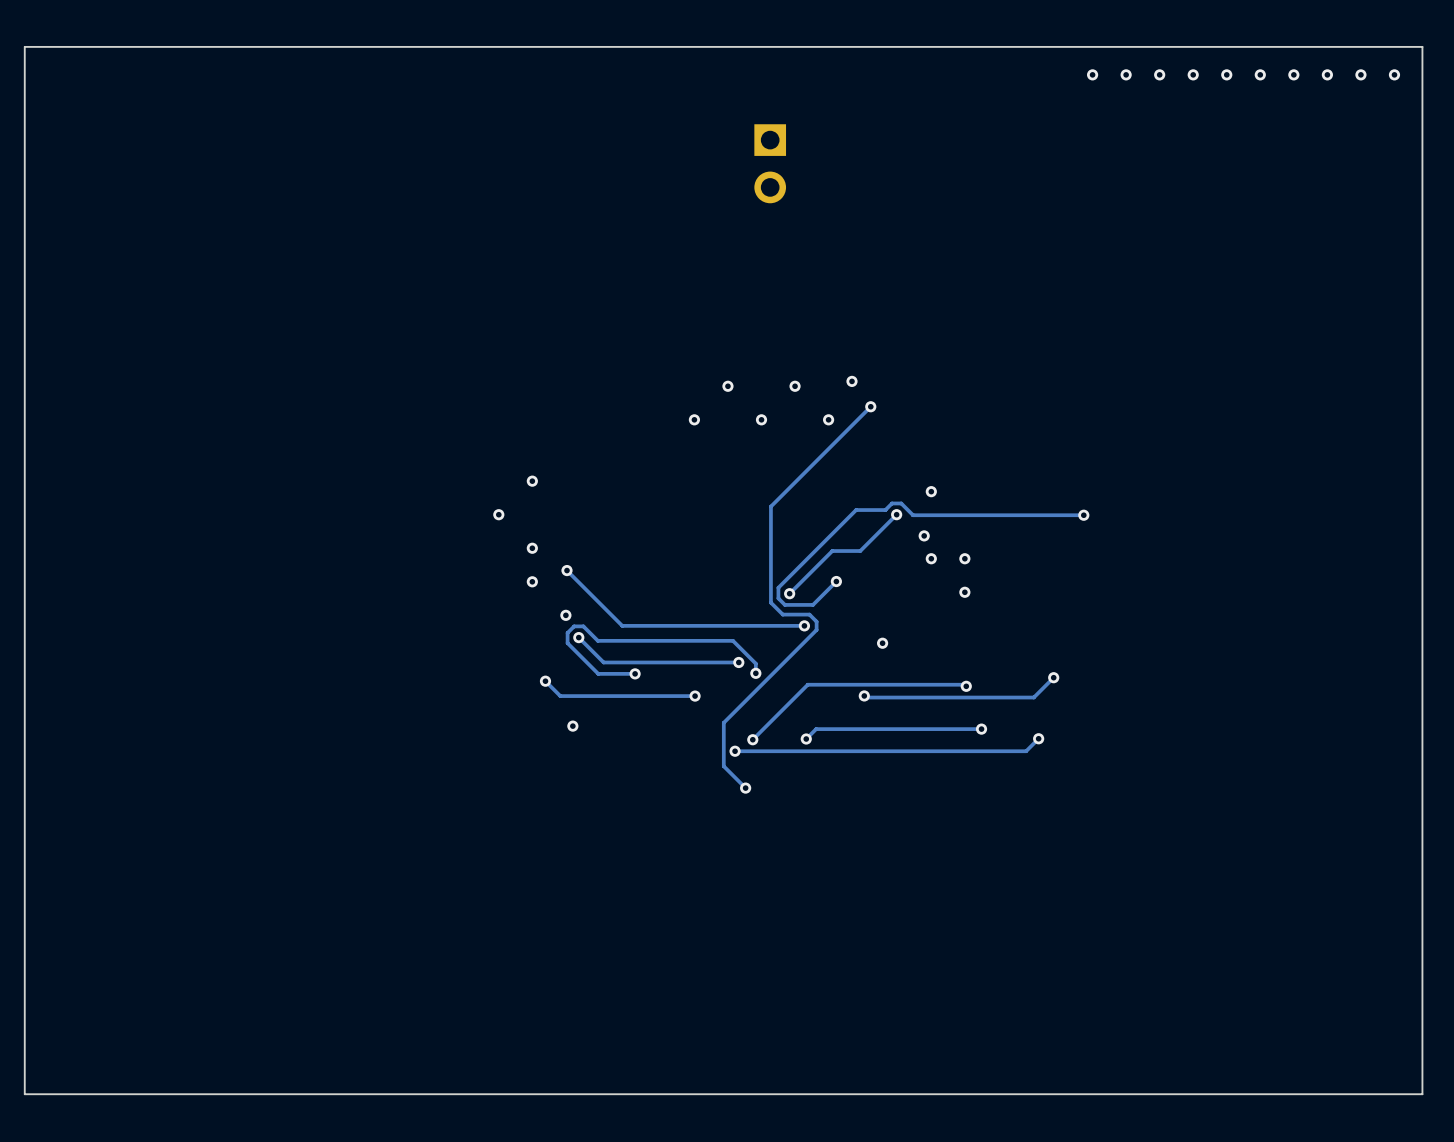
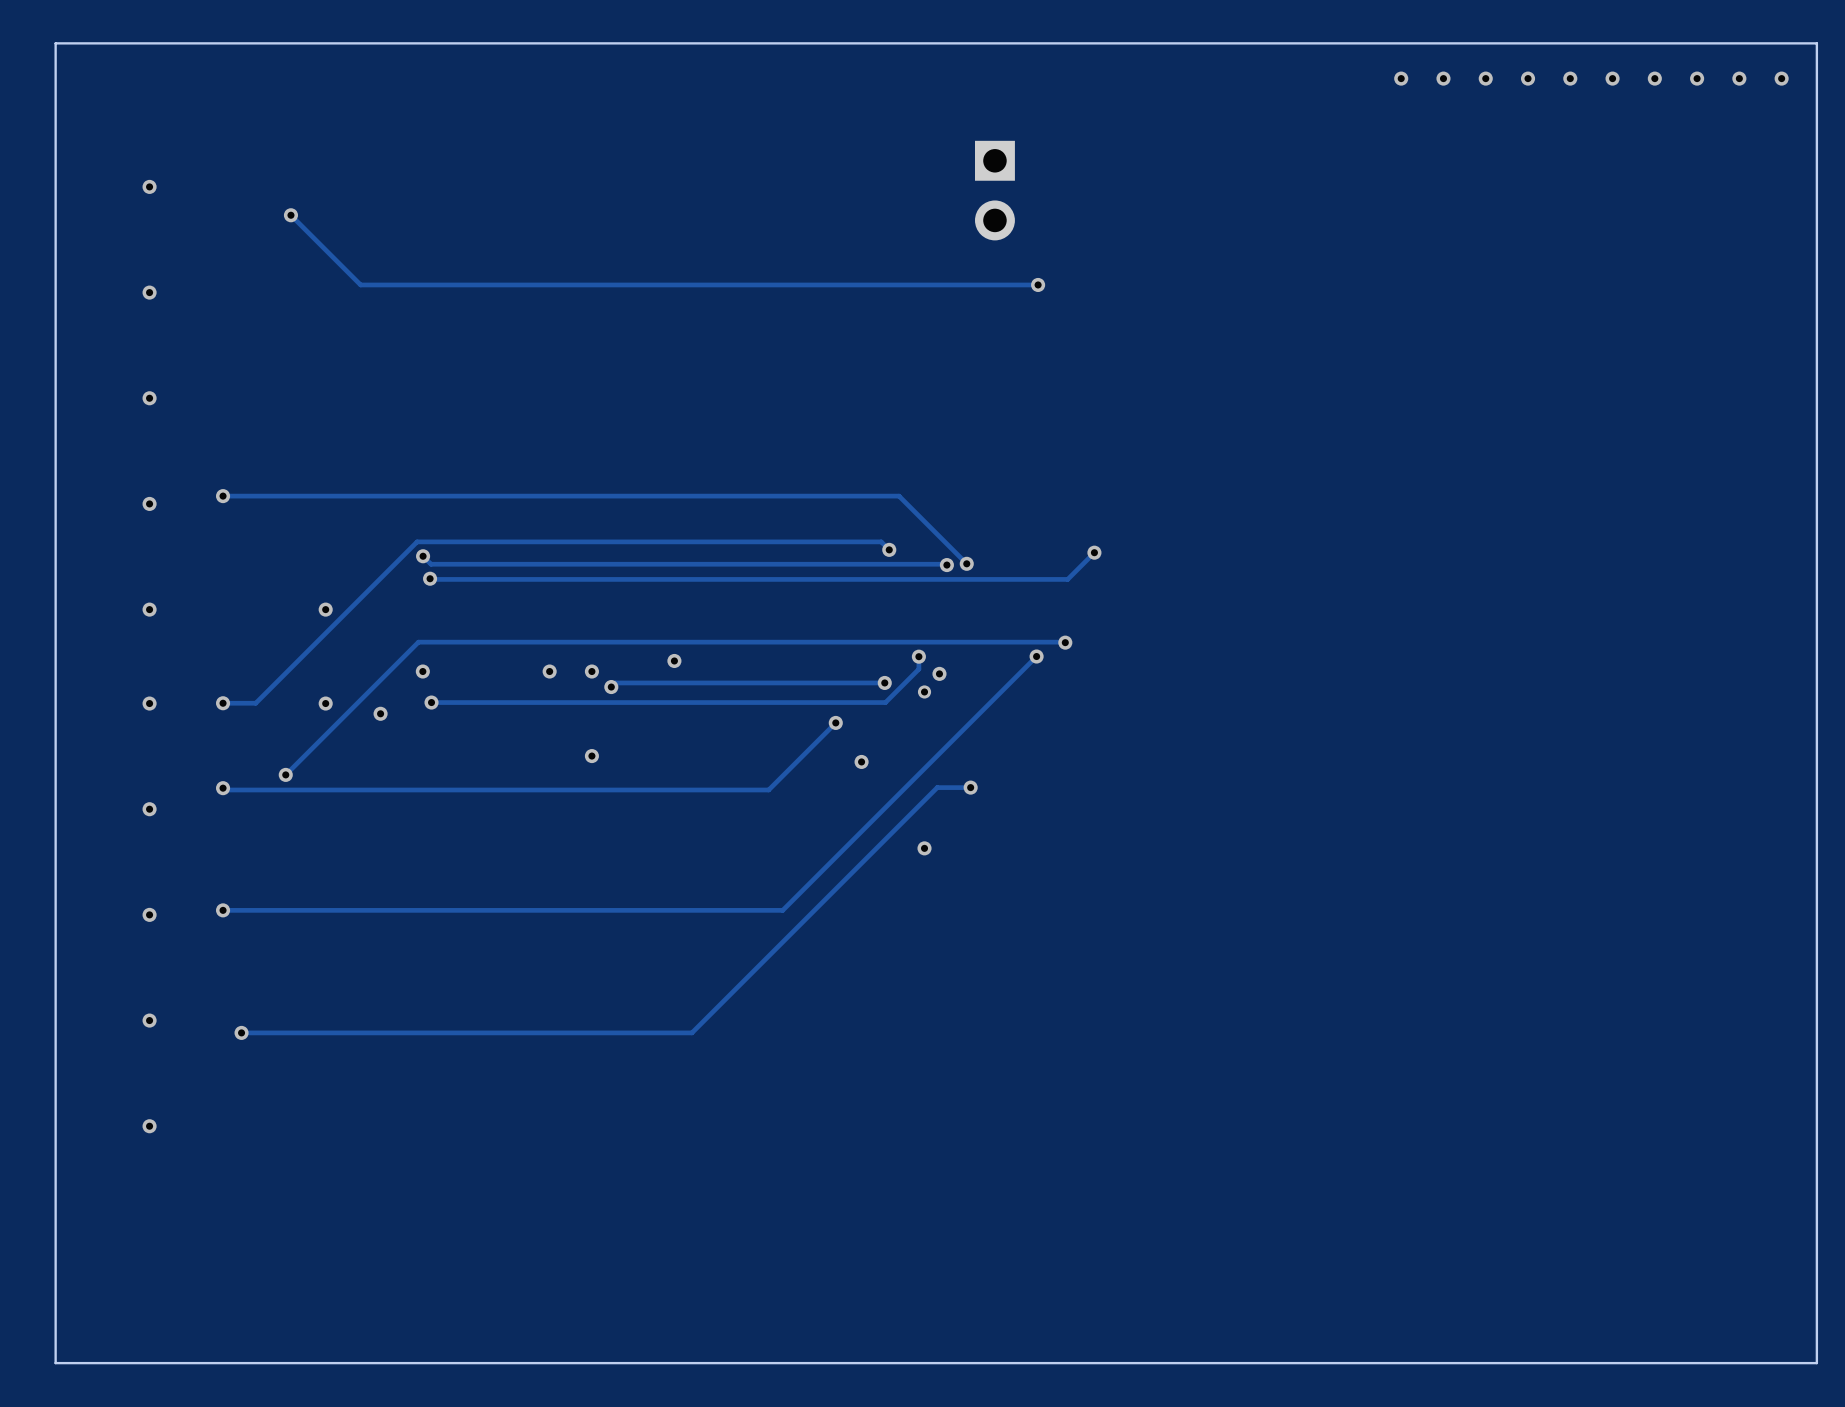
via: none -> (149, 186)
track: none -> (290, 215) (360, 284) (1038, 284)
via: none -> (290, 215)
via: none -> (1038, 284)
via: none -> (149, 292)
via: none -> (149, 398)
via: (852, 381) -> none
via: (727, 386) -> none
via: (795, 386) -> none
track: none -> (223, 496) (899, 496) (966, 563)
via: none -> (223, 496)
track: (870, 406) (770, 506) (770, 602) (782, 614) (809, 614) (816, 621) (816, 629) (723, 722) (723, 766) (745, 788) -> none
via: (870, 406) -> none
via: none -> (149, 503)
via: (694, 419) -> none
via: (761, 419) -> none
via: (828, 419) -> none
track: none -> (889, 549) (881, 541) (417, 541) (255, 703) (223, 703)
via: none -> (889, 549)
track: none -> (1094, 552) (1067, 579) (430, 578)
via: none -> (1094, 552)
track: none -> (423, 556) (431, 564) (946, 565)
via: none -> (423, 556)
via: none -> (966, 563)
via: none -> (946, 565)
via: none -> (430, 578)
via: (532, 481) -> none
via: (931, 491) -> none
via: none -> (149, 609)
via: none -> (325, 609)
via: (498, 514) -> none
track: (896, 514) (860, 551) (832, 551) (789, 593) -> none
via: (896, 514) -> none
track: (1083, 515) (913, 515) (901, 503) (892, 503) (885, 510) (856, 510) (778, 587) (778, 598) (784, 604) (812, 604) (836, 581) -> none
via: (1083, 515) -> none
track: none -> (1065, 642) (418, 642) (285, 774)
via: none -> (1065, 642)
track: none -> (918, 656) (918, 669) (885, 702) (431, 702)
via: none -> (918, 656)
track: none -> (1036, 656) (782, 910) (223, 910)
via: none -> (1036, 656)
via: (924, 535) -> none
via: none -> (674, 660)
via: none -> (422, 671)
via: none -> (549, 671)
via: none -> (591, 671)
via: none -> (939, 673)
via: (532, 548) -> none
track: none -> (884, 682) (615, 682) (611, 687)
via: none -> (884, 682)
via: none -> (611, 687)
via: (931, 558) -> none
via: (964, 558) -> none
via: none -> (924, 691)
via: none -> (149, 703)
via: none -> (223, 703)
via: none -> (325, 703)
via: none -> (431, 702)
track: (566, 570) (622, 625) (804, 625) -> none
via: (566, 570) -> none
via: none -> (380, 713)
via: (532, 581) -> none
via: (836, 581) -> none
track: none -> (835, 722) (768, 789) (224, 789) (223, 788)
via: none -> (835, 722)
via: (964, 592) -> none
via: (789, 593) -> none
via: none -> (591, 756)
via: (565, 615) -> none
via: none -> (861, 761)
via: (804, 625) -> none
via: none -> (285, 774)
via: none -> (223, 788)
track: (578, 637) (603, 662) (738, 662) -> none
via: (578, 637) -> none
track: none -> (970, 787) (937, 787) (691, 1032) (241, 1032)
via: none -> (970, 787)
via: (882, 643) -> none
via: none -> (149, 809)
via: (738, 662) -> none
via: (635, 673) -> none
track: (755, 673) (755, 663) (733, 640) (597, 640) (583, 626) (574, 626) (567, 632) (567, 643) (598, 673) (635, 673) -> none
via: (755, 673) -> none
track: (1053, 677) (1033, 697) (865, 697) (864, 695) -> none
via: (1053, 677) -> none
track: (545, 681) (560, 696) (695, 696) -> none
via: (545, 681) -> none
via: none -> (924, 848)
track: (966, 686) (964, 684) (807, 684) (752, 739) -> none
via: (966, 686) -> none
via: (864, 695) -> none
via: (695, 696) -> none
via: (572, 726) -> none
track: (981, 729) (816, 729) (806, 739) -> none
via: (981, 729) -> none
via: none -> (223, 910)
via: none -> (149, 914)
track: (1038, 738) (1026, 751) (735, 751) -> none
via: (1038, 738) -> none
via: (752, 739) -> none
via: (806, 739) -> none
via: (735, 751) -> none
via: (745, 788) -> none
via: none -> (149, 1020)
via: none -> (241, 1032)
via: none -> (149, 1126)

